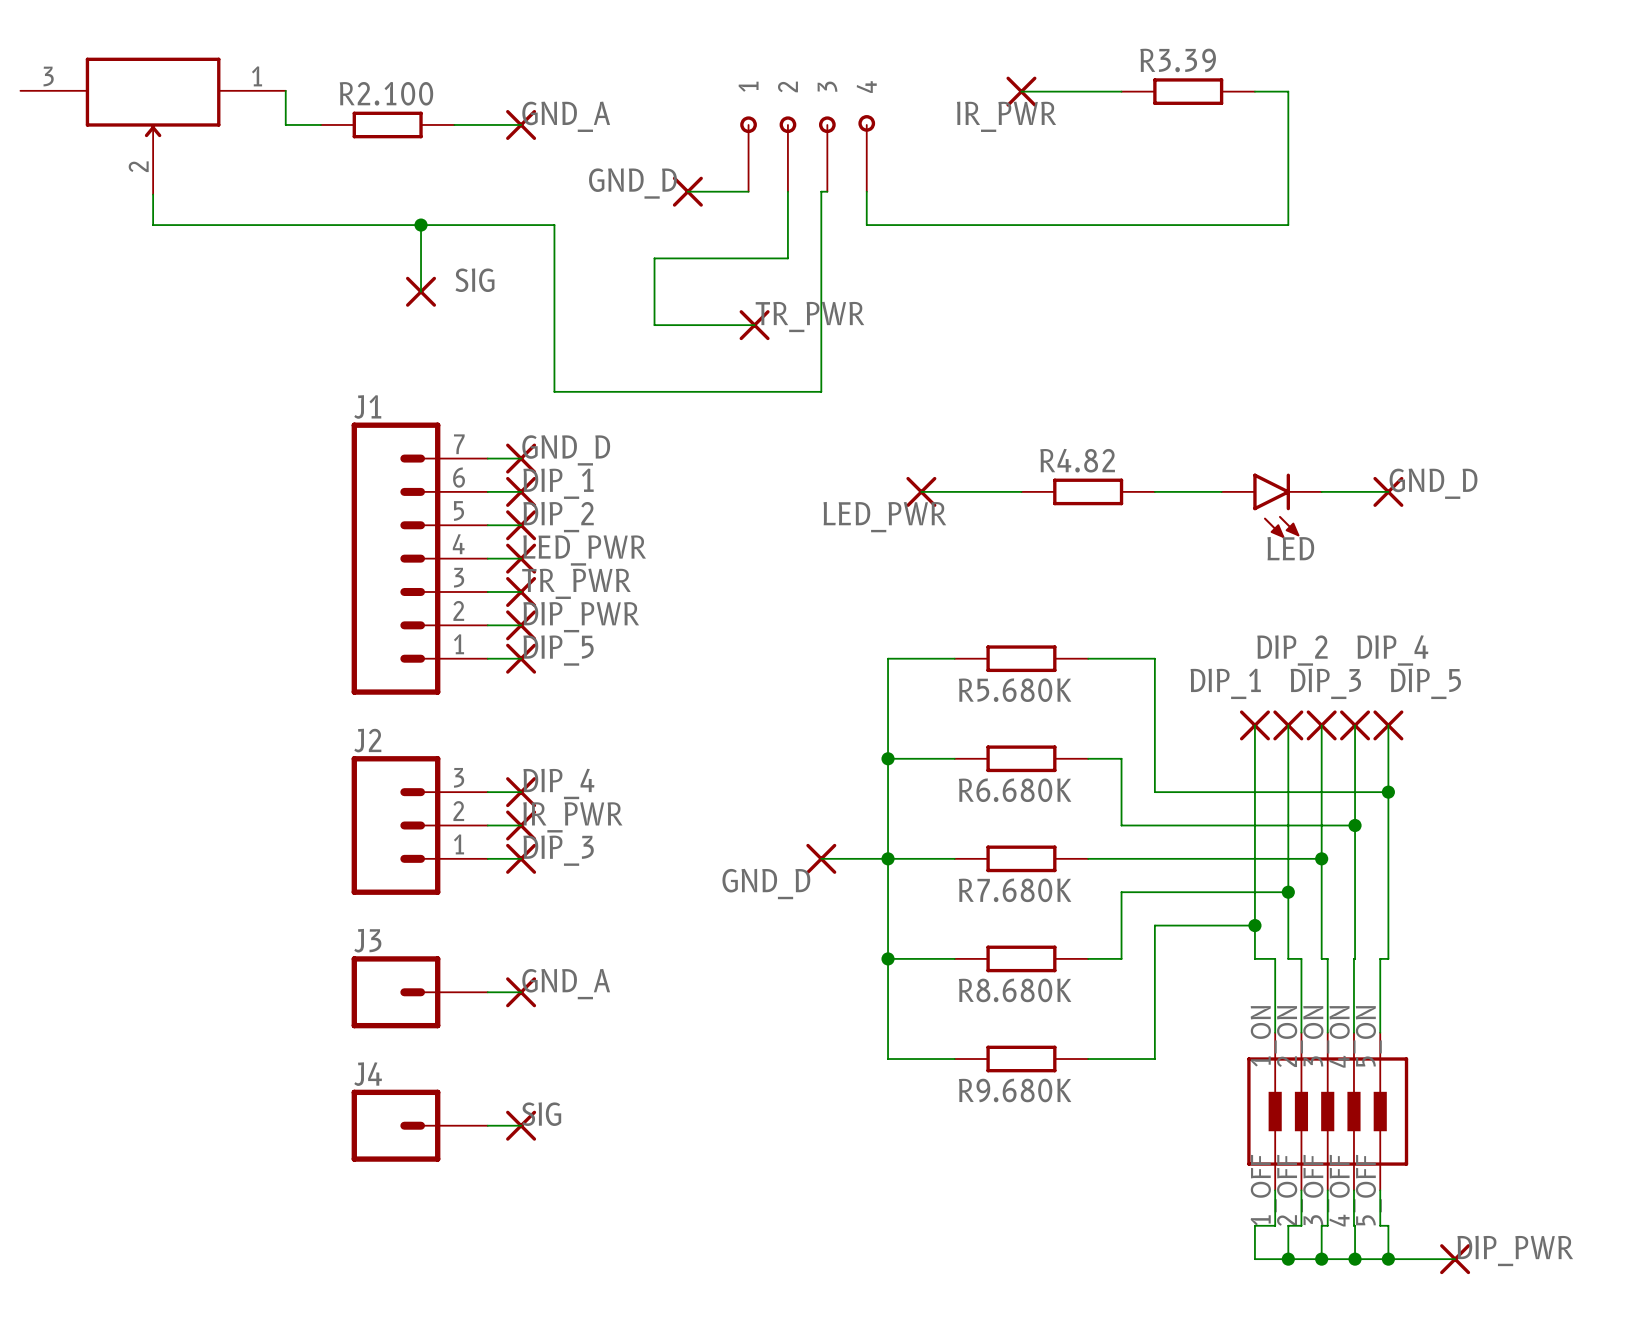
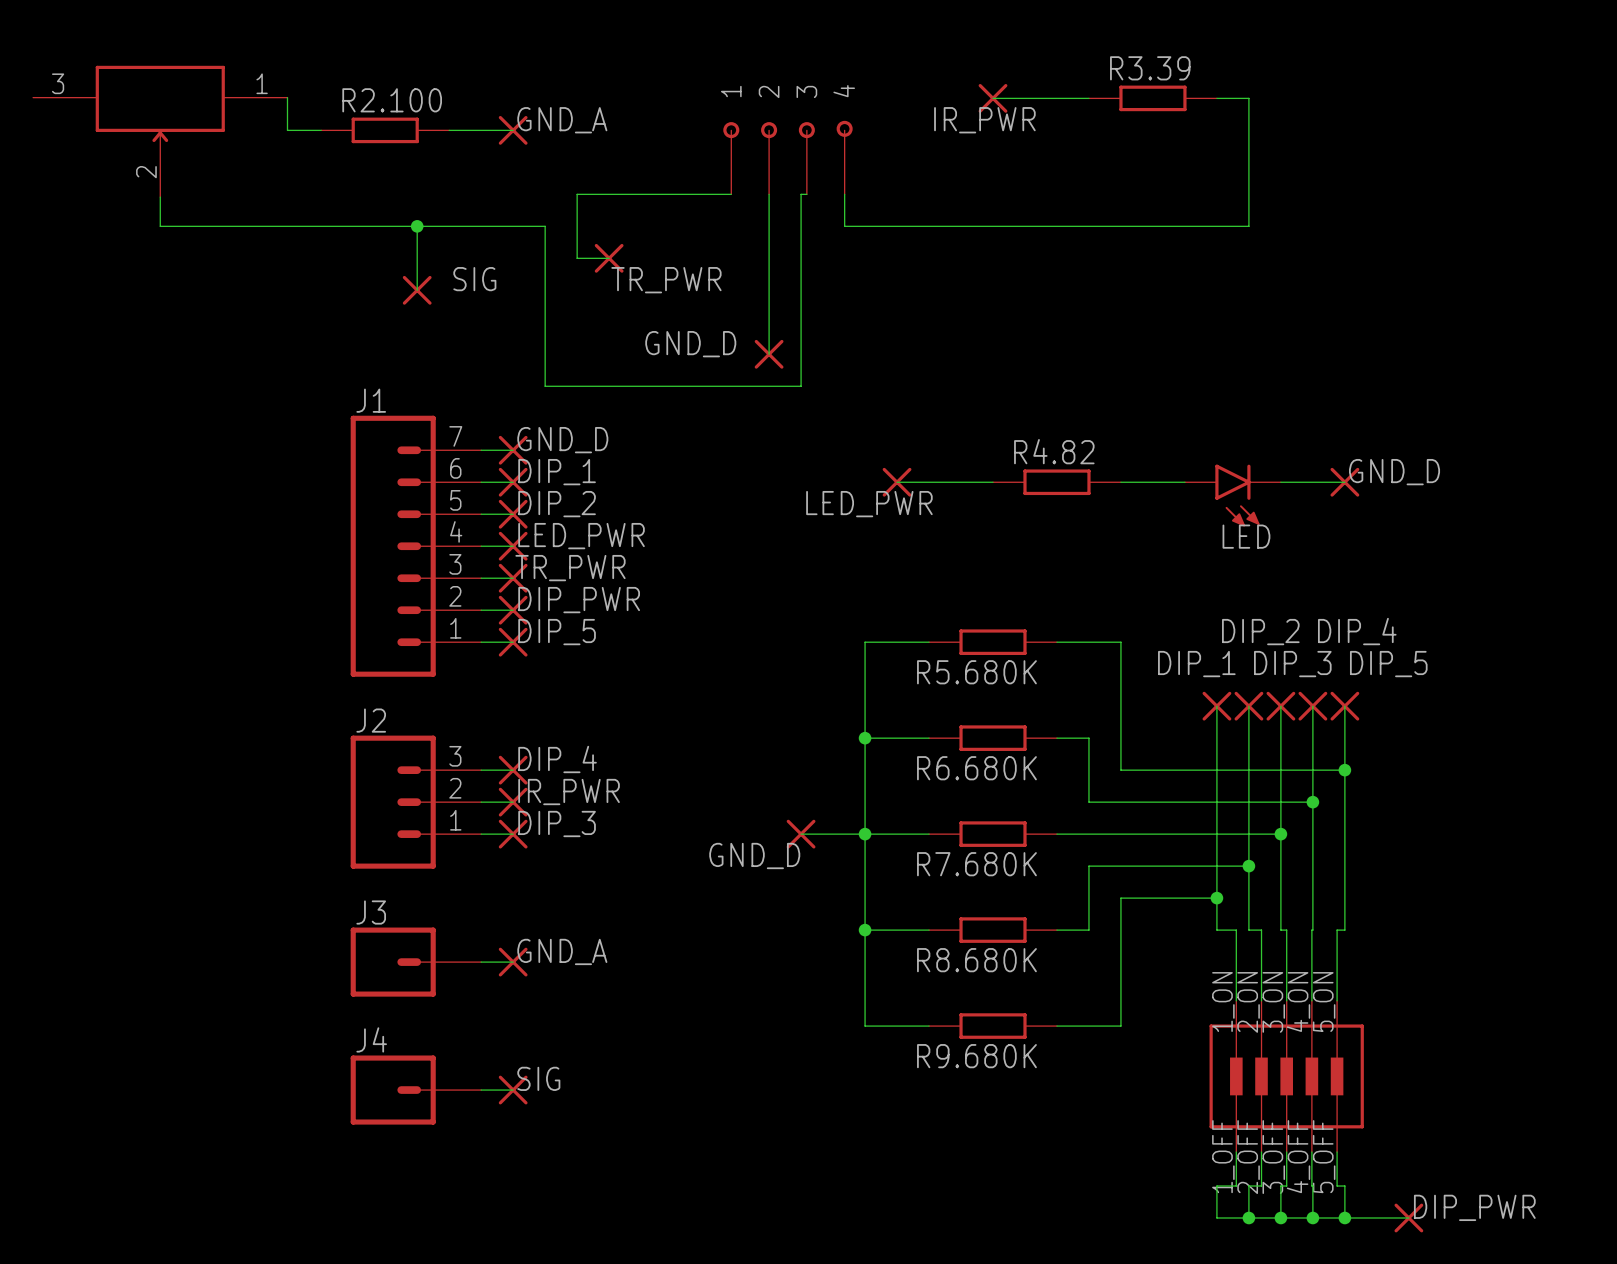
label position: GND_D (632, 183) -> GND_D (690, 344)
wire: none -> (673, 194) (577, 194) (577, 258) (609, 258)
part: (687, 191) -> none
part: none -> (609, 258)
wire: (787, 258) (654, 258) (654, 325) (754, 325) -> (769, 258) (769, 354)
label position: TR_PWR (809, 316) -> TR_PWR (666, 280)
part position: (754, 325) -> (769, 354)

